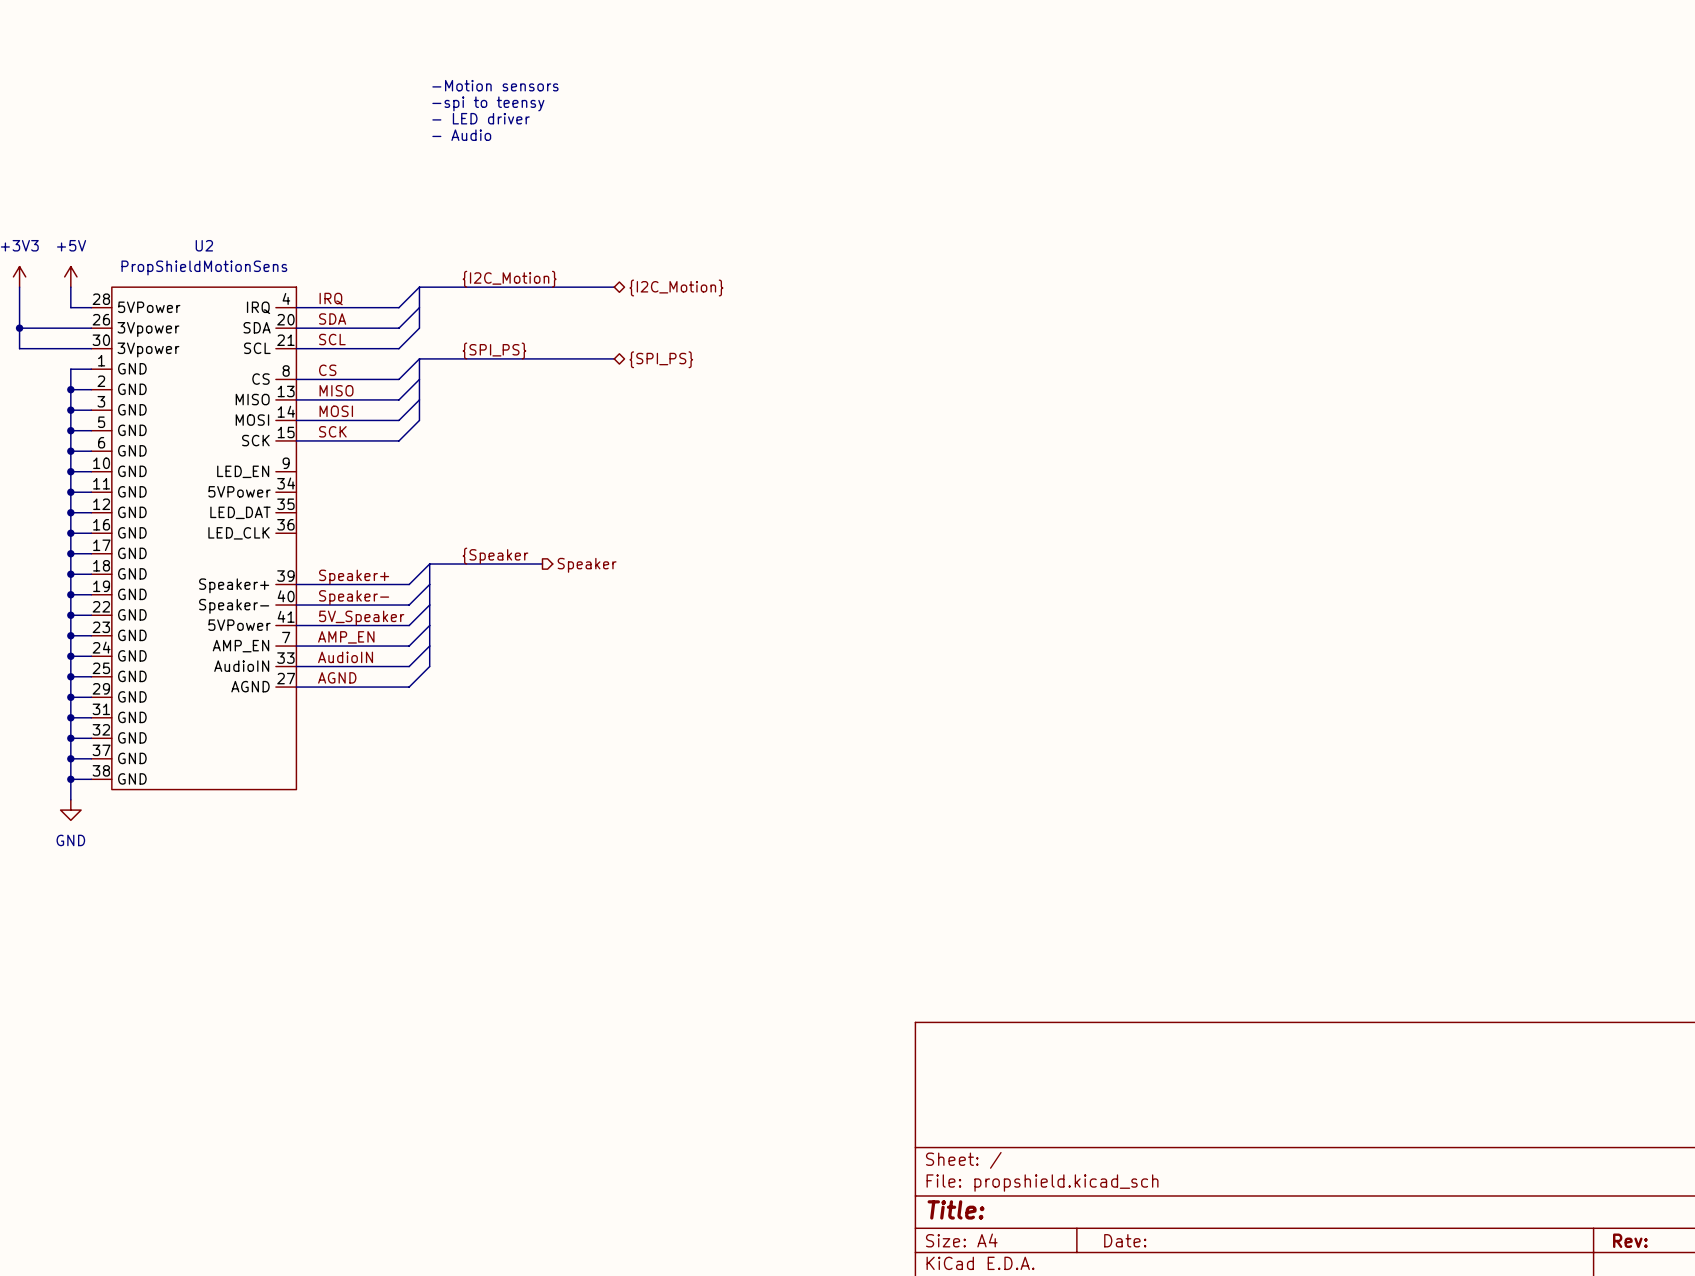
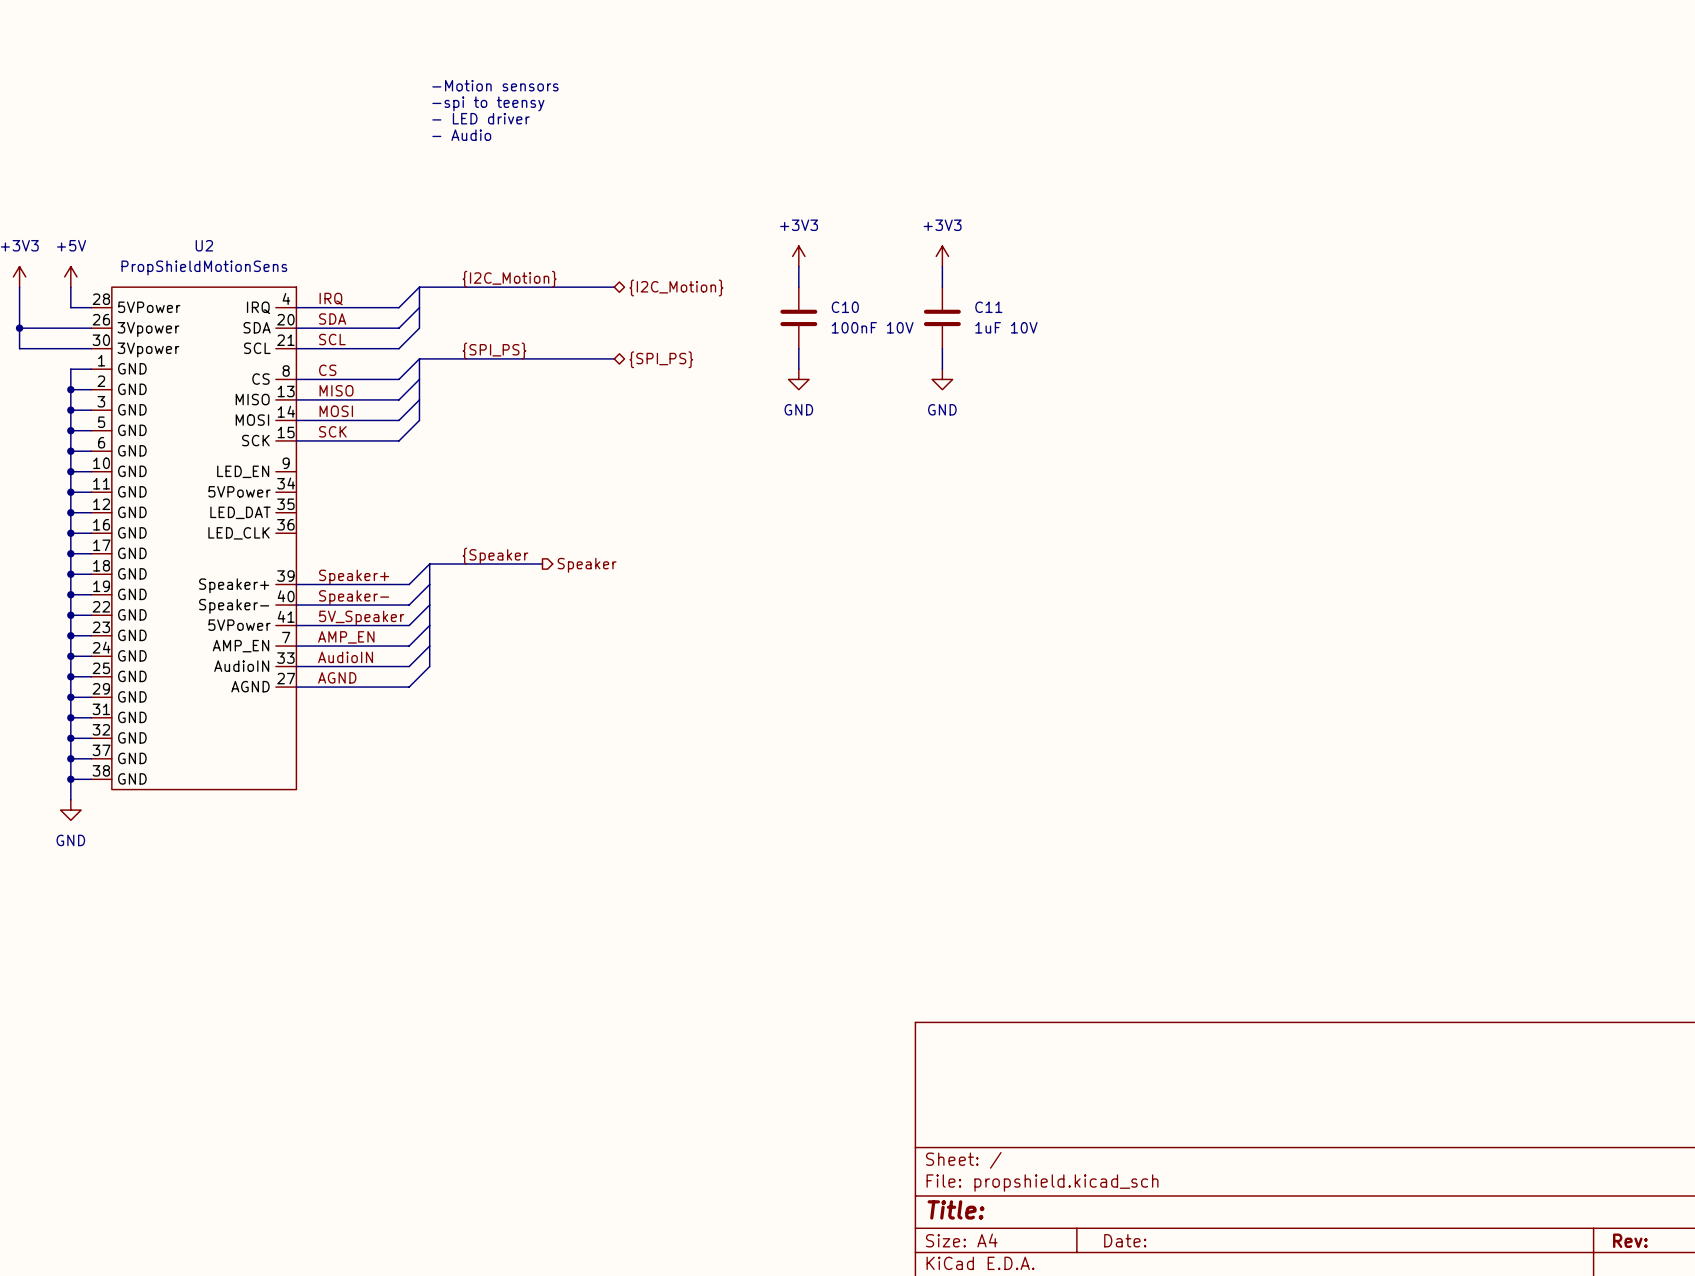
power symbol: none -> +3V3 (798, 256)
power symbol: none -> +3V3 (942, 256)
wire: none -> (798, 266) (798, 287)
wire: none -> (942, 266) (942, 287)
C10: none -> 100nF 10V (798, 317)
C11: none -> 1uF 10V (942, 317)
wire: none -> (798, 348) (798, 369)
wire: none -> (942, 348) (942, 369)
power symbol: none -> GND (798, 379)
power symbol: none -> GND (942, 379)

